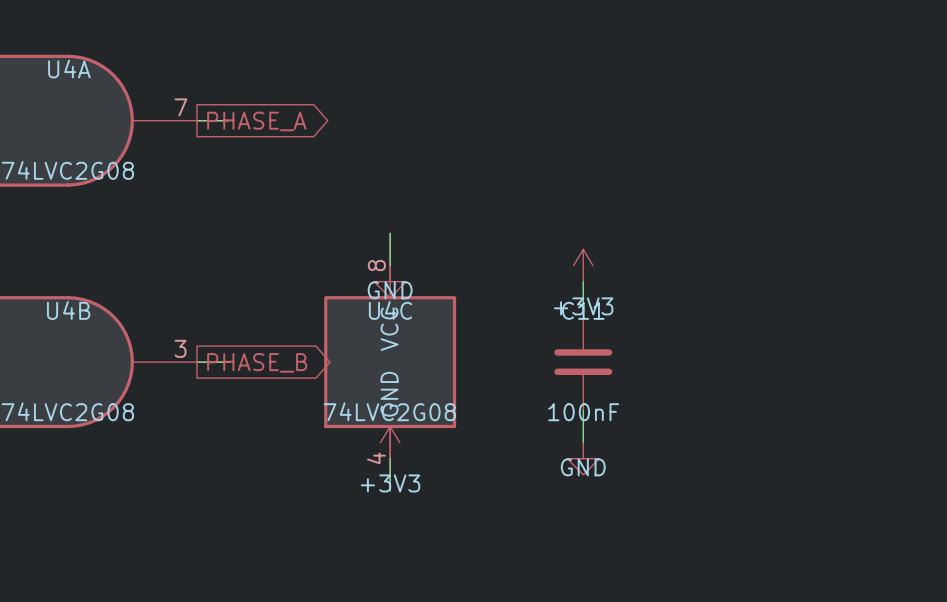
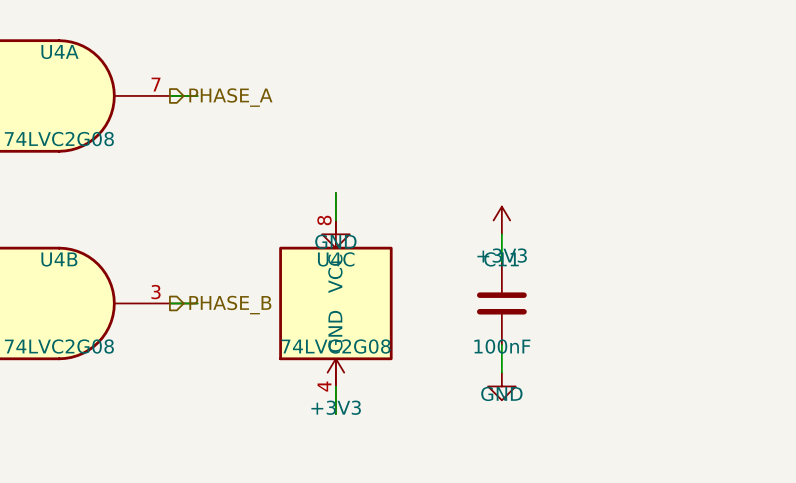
hierarchical label: none -> PHASE_A (230, 97)
global label: PHASE_A (256, 121) -> none
global label: PHASE_B (257, 362) -> none
hierarchical label: none -> PHASE_B (230, 305)

